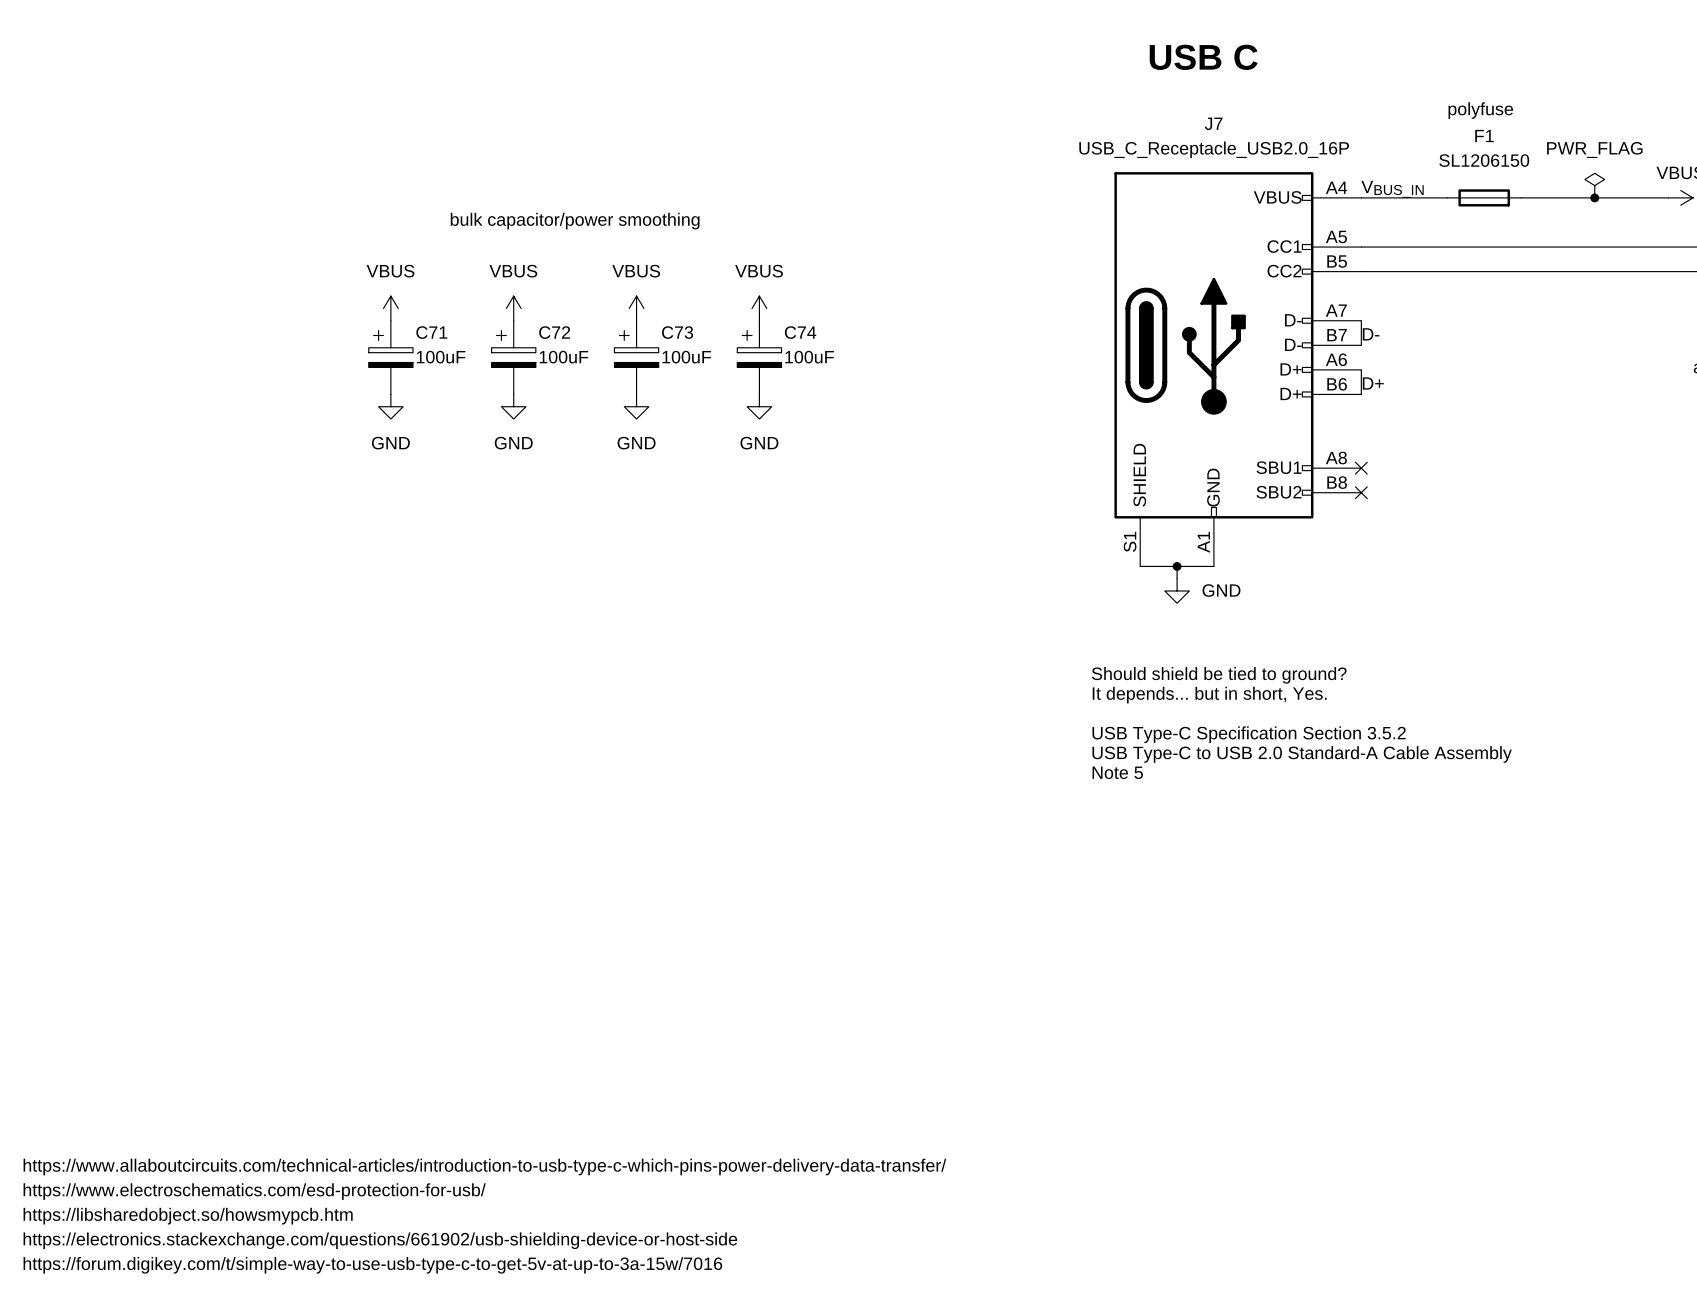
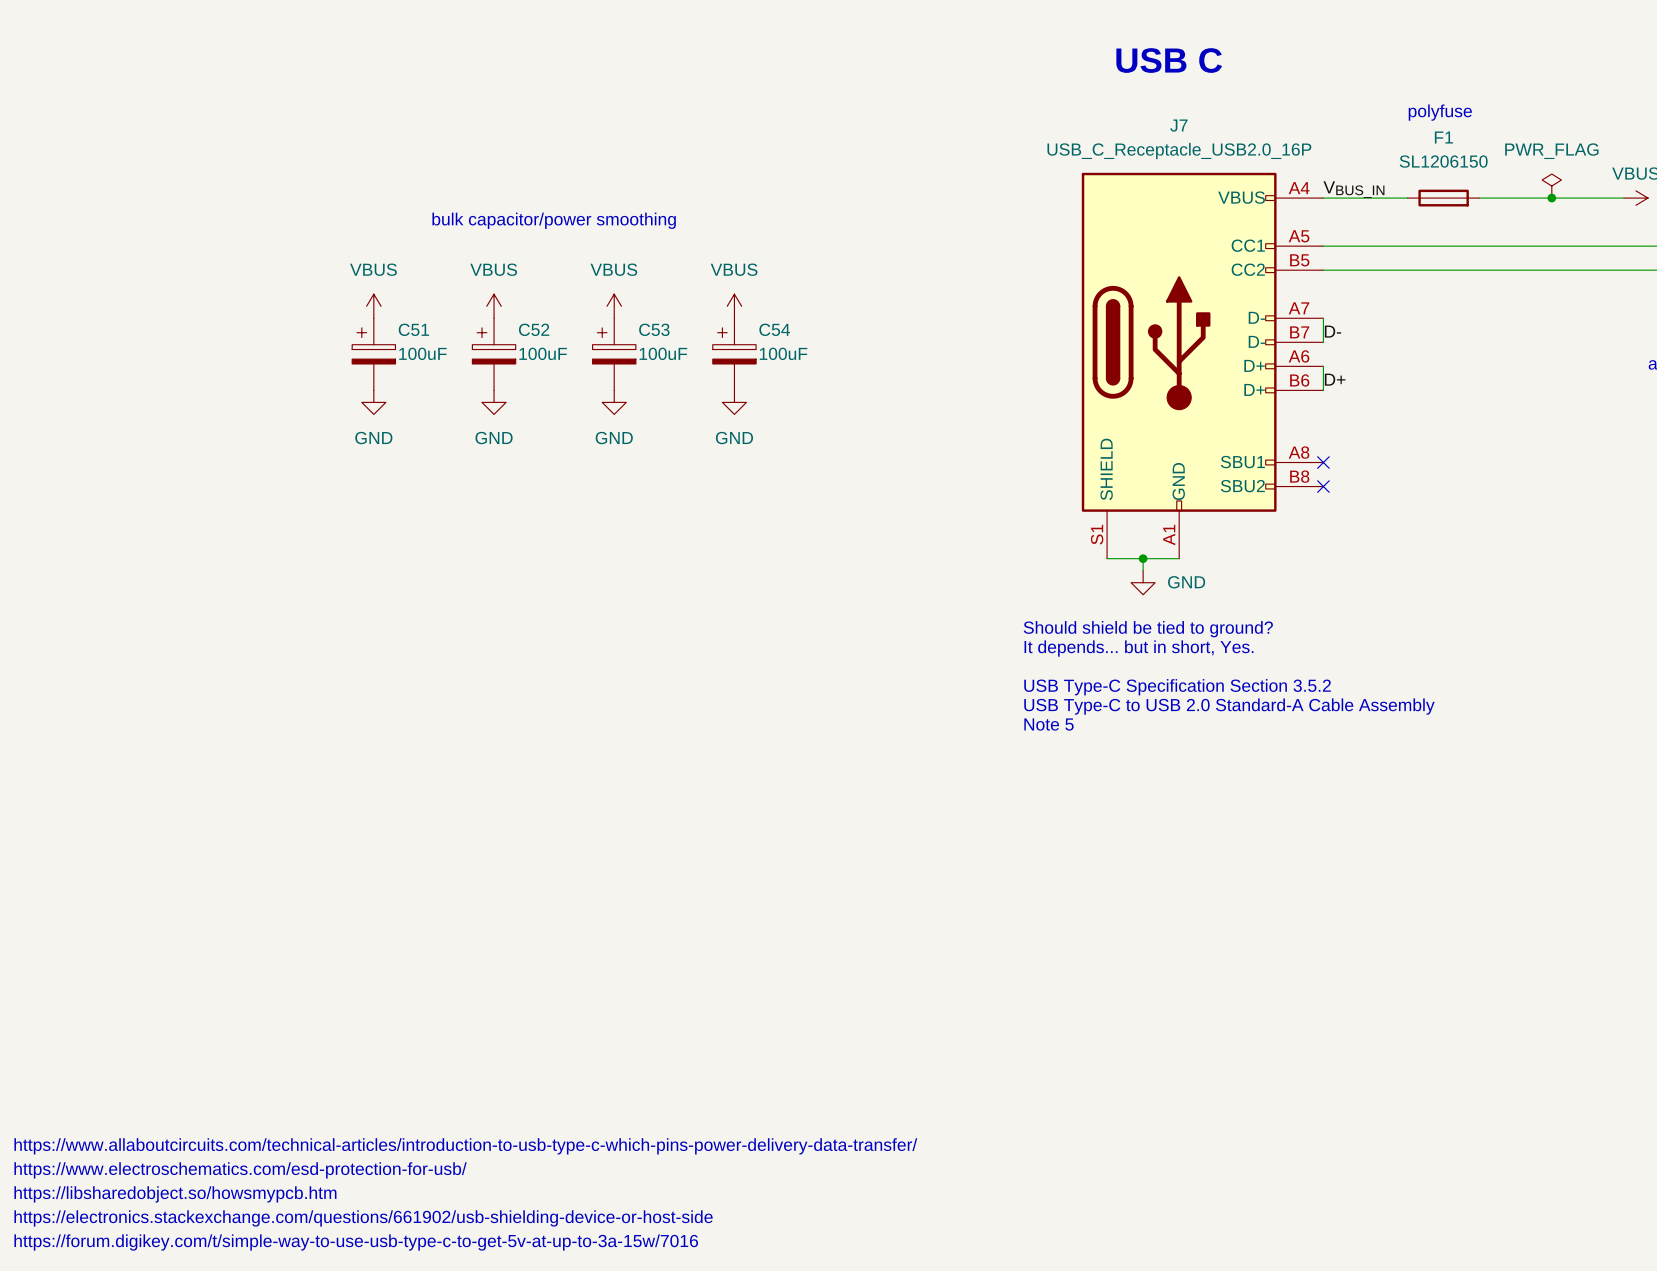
C71 name: C71 (431, 332) -> C51 (413, 329)
C72 name: C72 (554, 332) -> C52 (534, 329)
C73 name: C73 (677, 332) -> C53 (654, 329)
C74 name: C74 (800, 332) -> C54 (774, 329)
text position: Should shield be tied to ground? (1219, 675) -> Should shield be tied to ground? (1148, 629)
text position: It depends... but in short, Yes. (1209, 695) -> It depends... but in short, Yes. (1138, 648)
text position: USB Type-C Specification Section 3.5.2 (1249, 734) -> USB Type-C Specification Section 3.5.2 (1177, 687)
text position: USB Type-C to USB 2.0 Standard-A Cable Assembly (1302, 754) -> USB Type-C to USB 2.0 Standard-A Cable Assembly (1229, 706)
text position: Note 5 (1117, 772) -> Note 5 (1049, 724)

